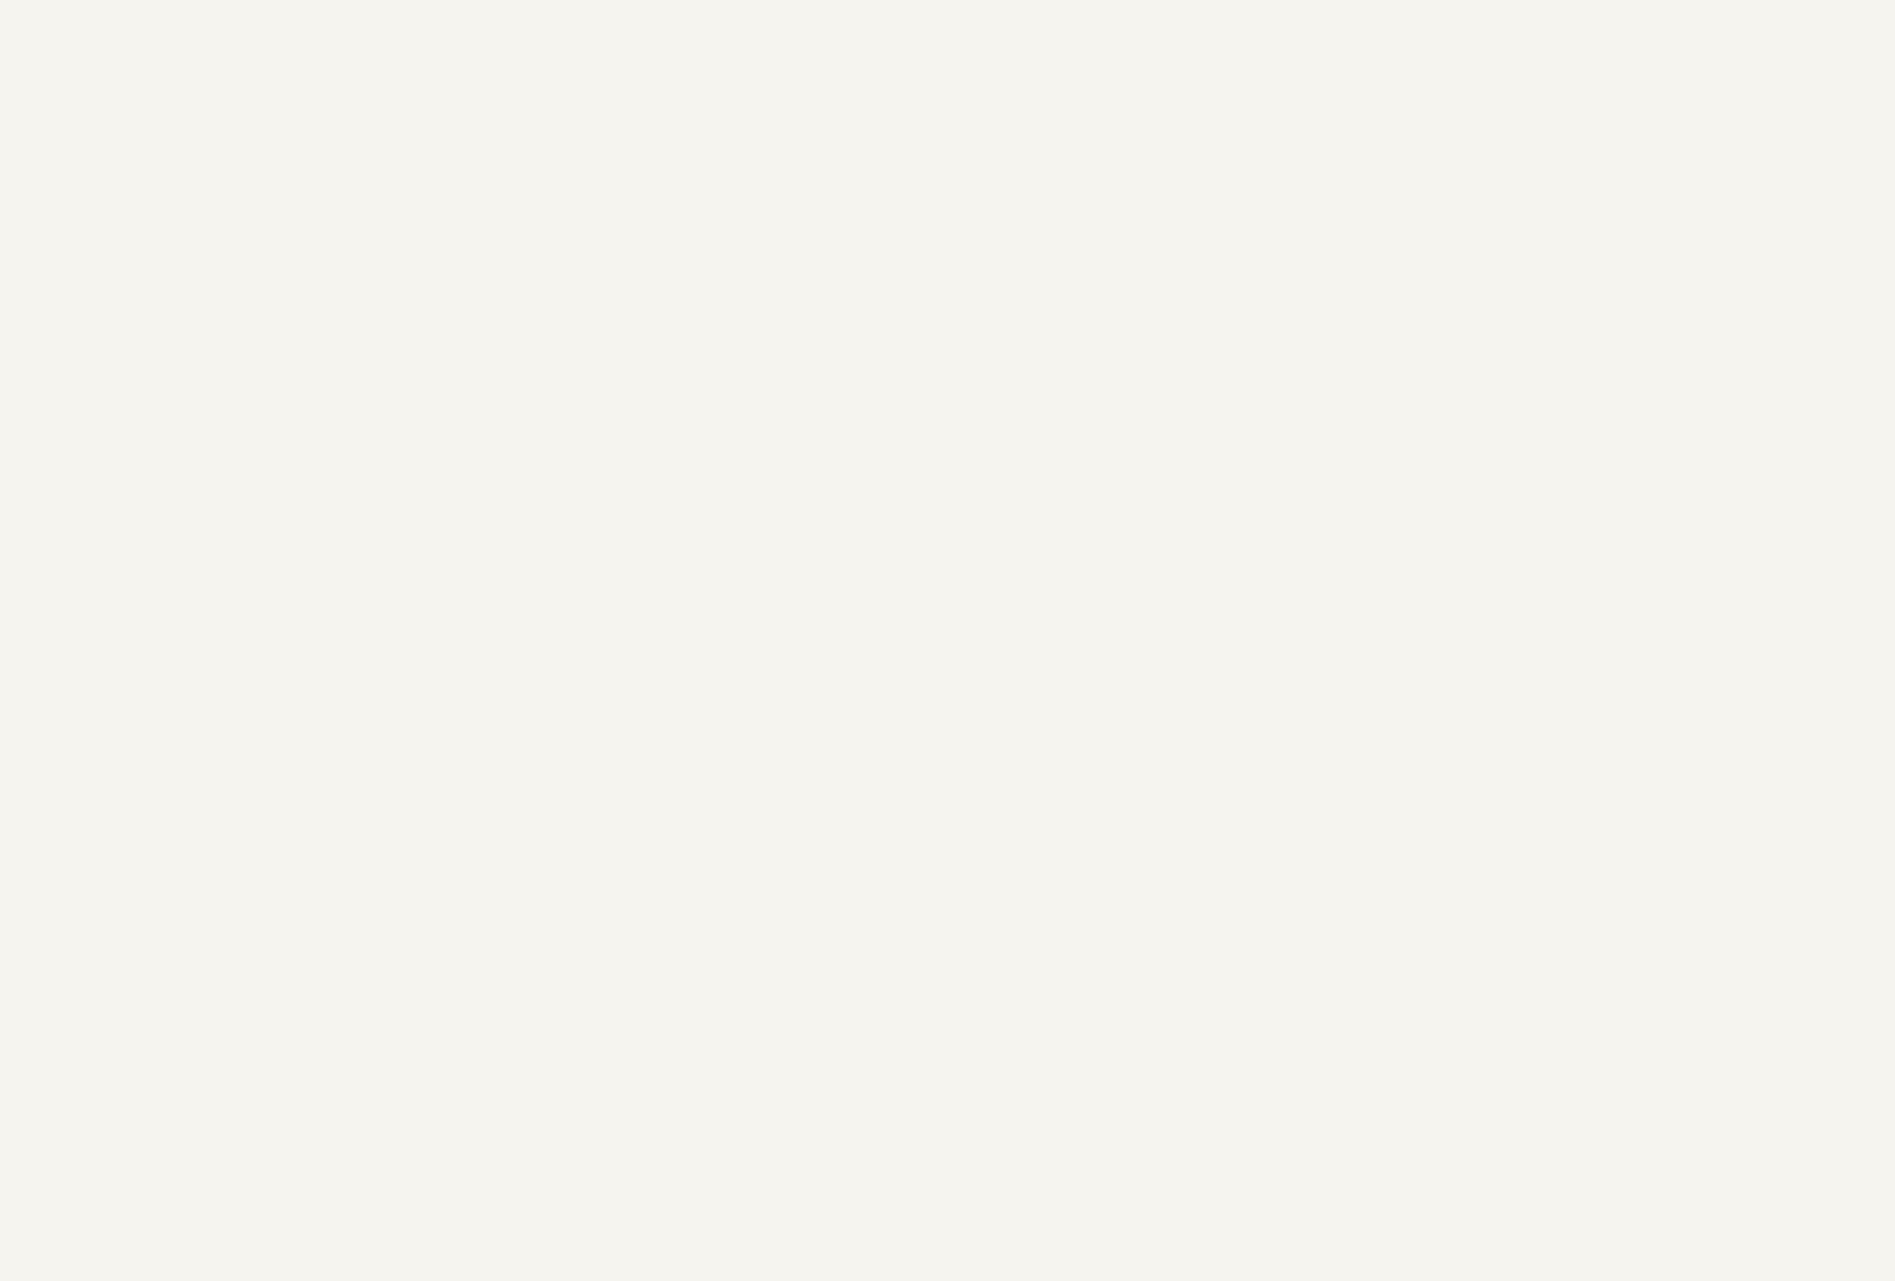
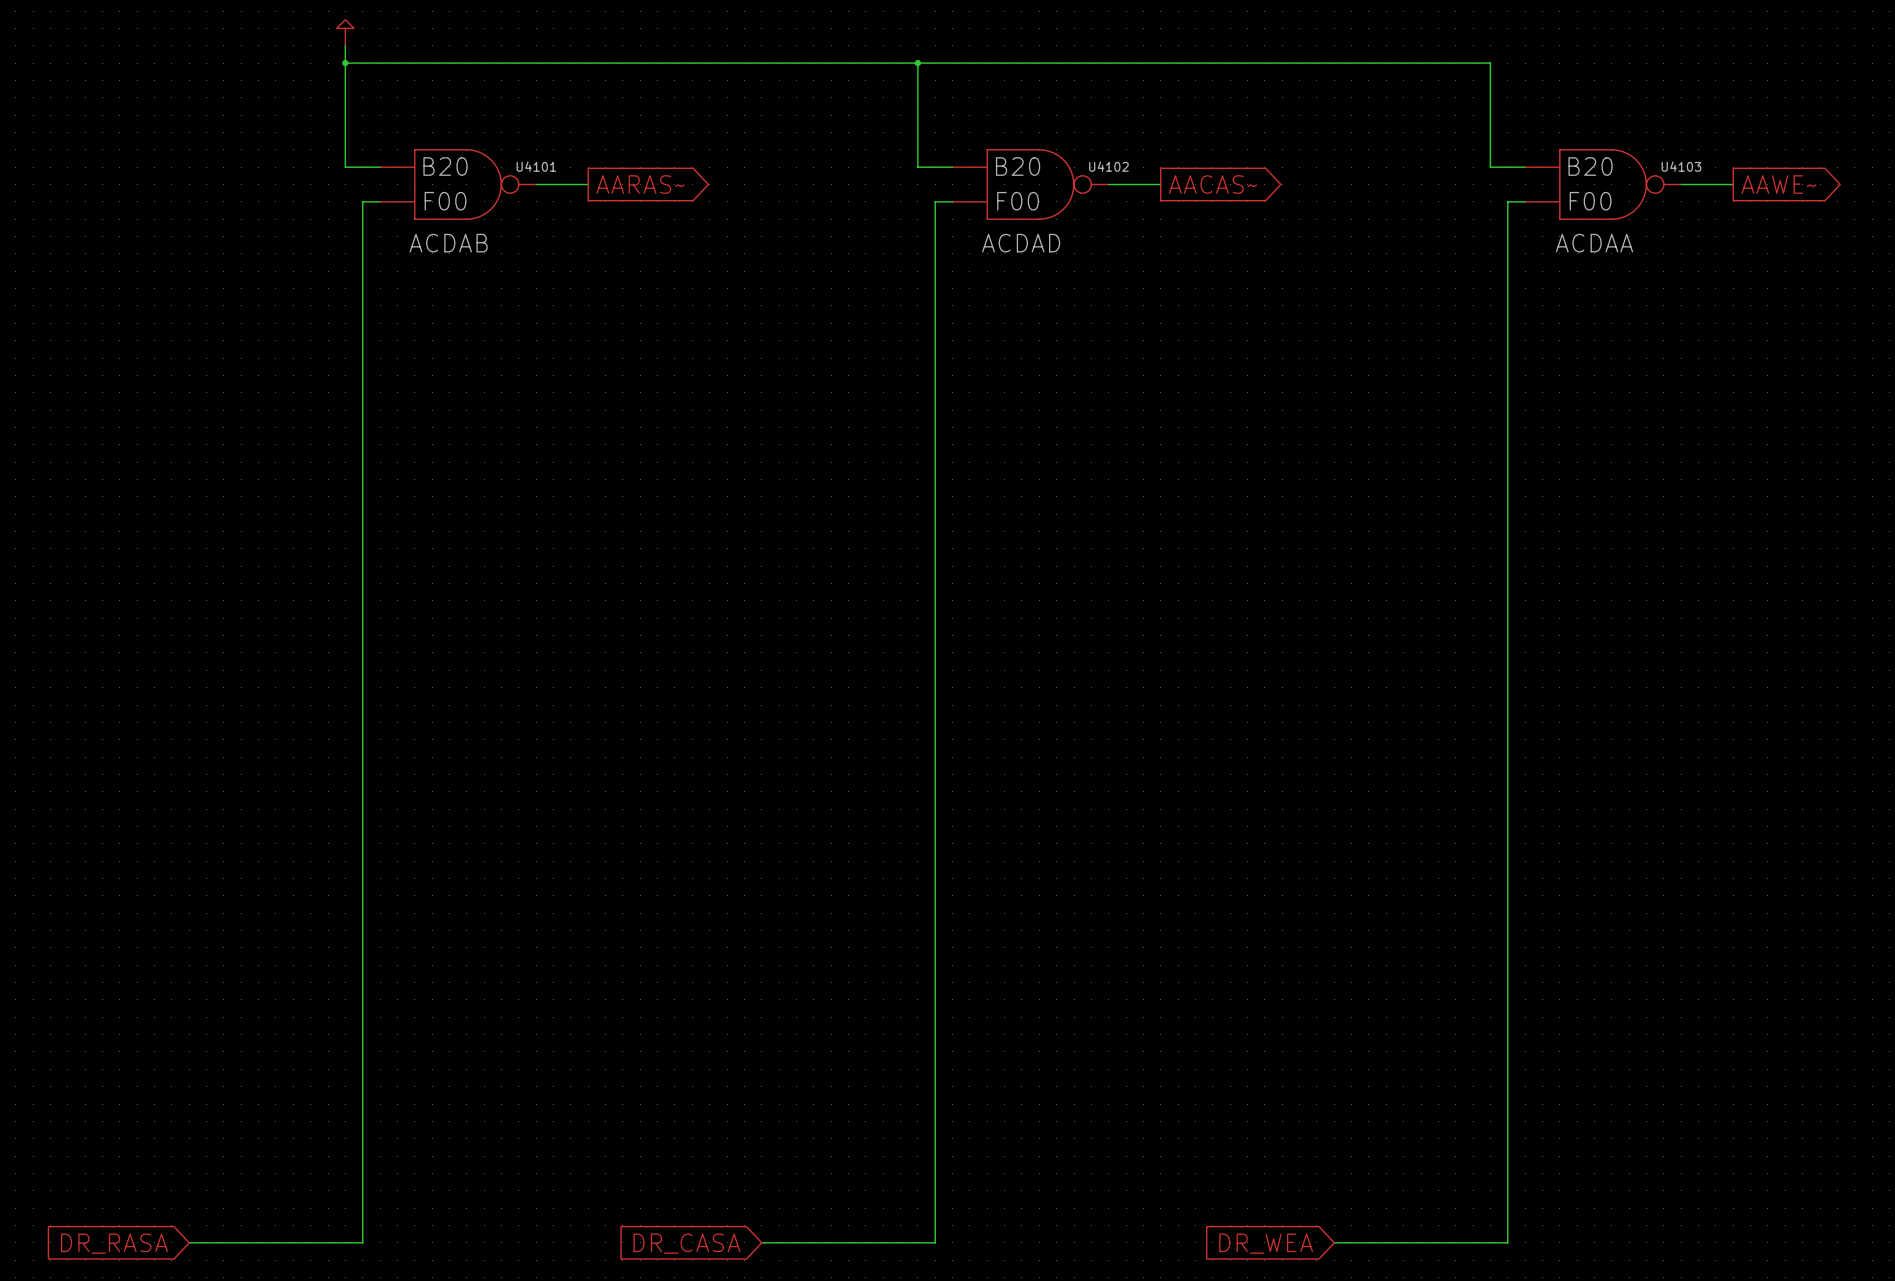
power symbol: none -> (345, 32)
wire: none -> (345, 45) (345, 167) (380, 167)
wire: none -> (345, 63) (1490, 63) (1490, 167) (1525, 167)
junction: none -> (345, 63)
wire: none -> (917, 63) (917, 167) (952, 167)
junction: none -> (917, 63)
U4101: none -> F00 (458, 184)
wire: none -> (536, 184) (588, 184)
global label: none -> AARAS~ (640, 184)
U4102: none -> F00 (1030, 184)
wire: none -> (1108, 184) (1160, 184)
global label: none -> AACAS~ (1212, 184)
U4103: none -> F00 (1603, 184)
wire: none -> (1681, 184) (1733, 184)
global label: none -> AAWE~ (1778, 184)
wire: none -> (380, 201) (362, 201) (362, 1242) (189, 1242)
wire: none -> (952, 201) (935, 201) (935, 1242) (761, 1242)
wire: none -> (1525, 201) (1507, 201) (1507, 1242) (1334, 1242)
global label: none -> DR_RASA (114, 1243)
global label: none -> DR_CASA (687, 1243)
global label: none -> DR_WEA (1266, 1243)

